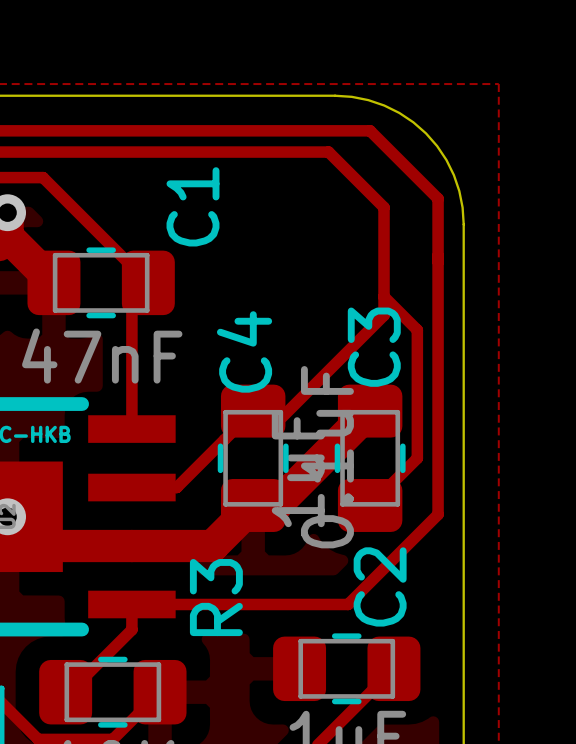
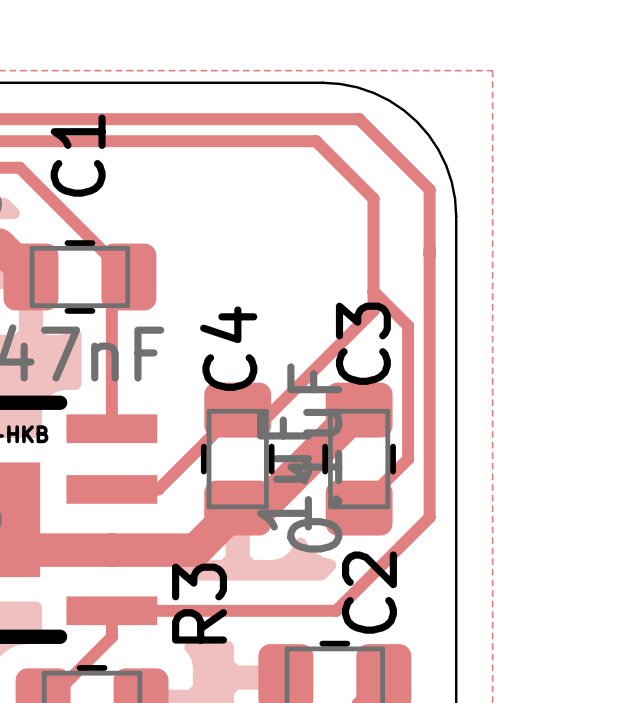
C1 name position: C1 (193, 206) -> C1 (78, 155)

